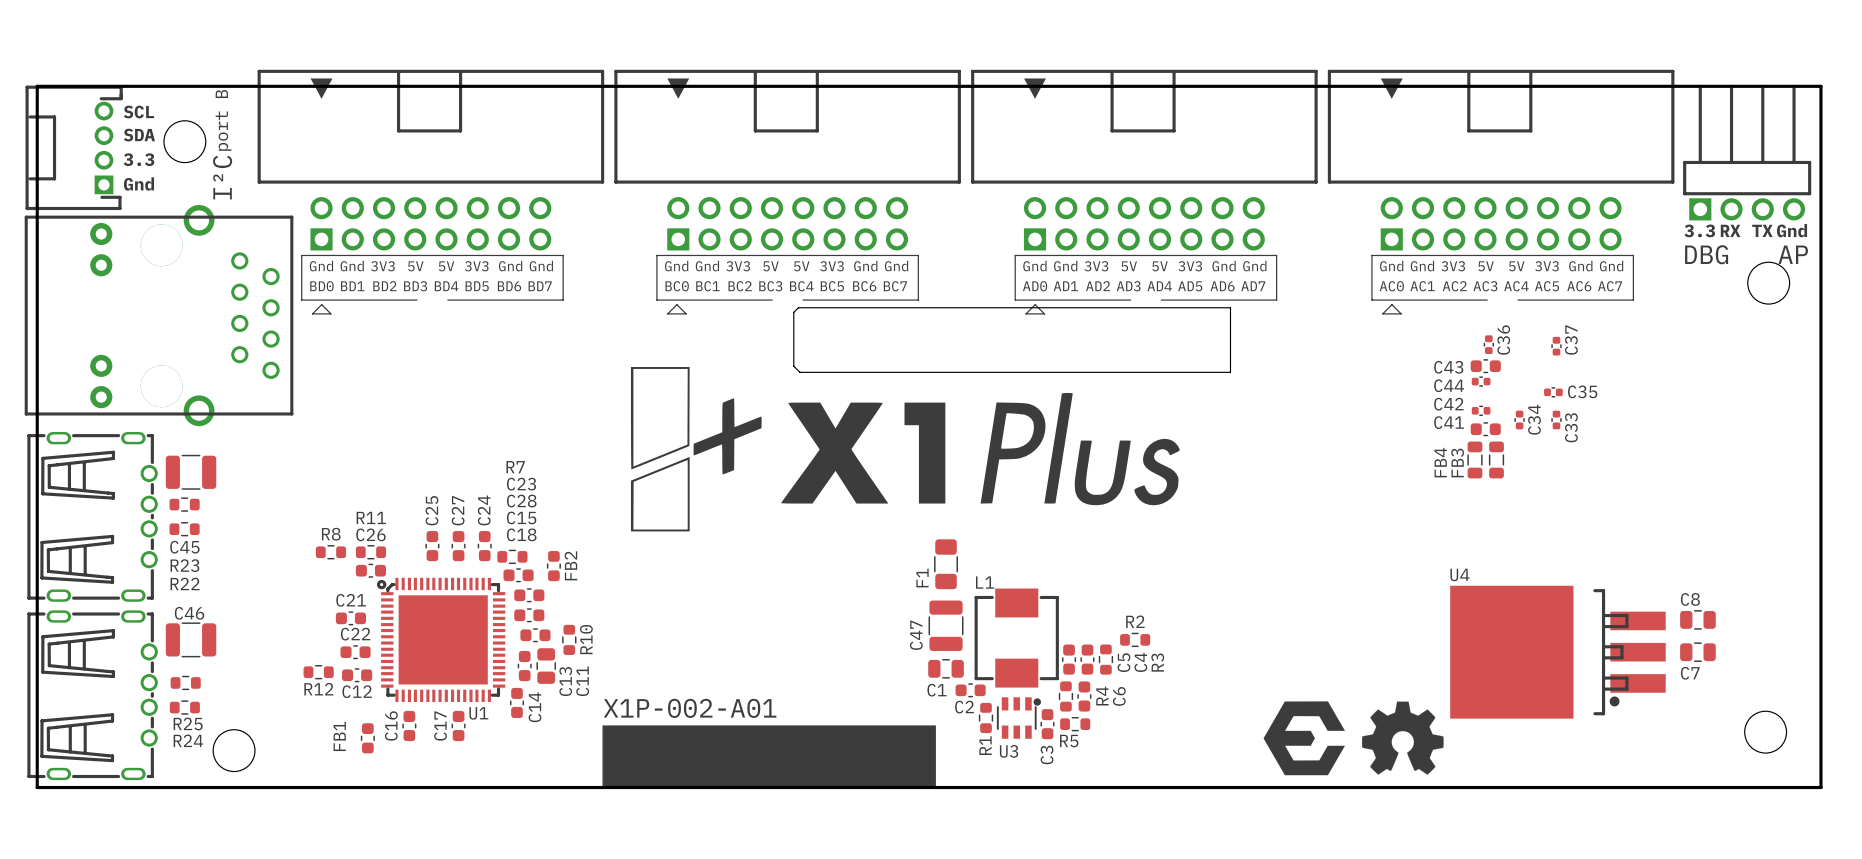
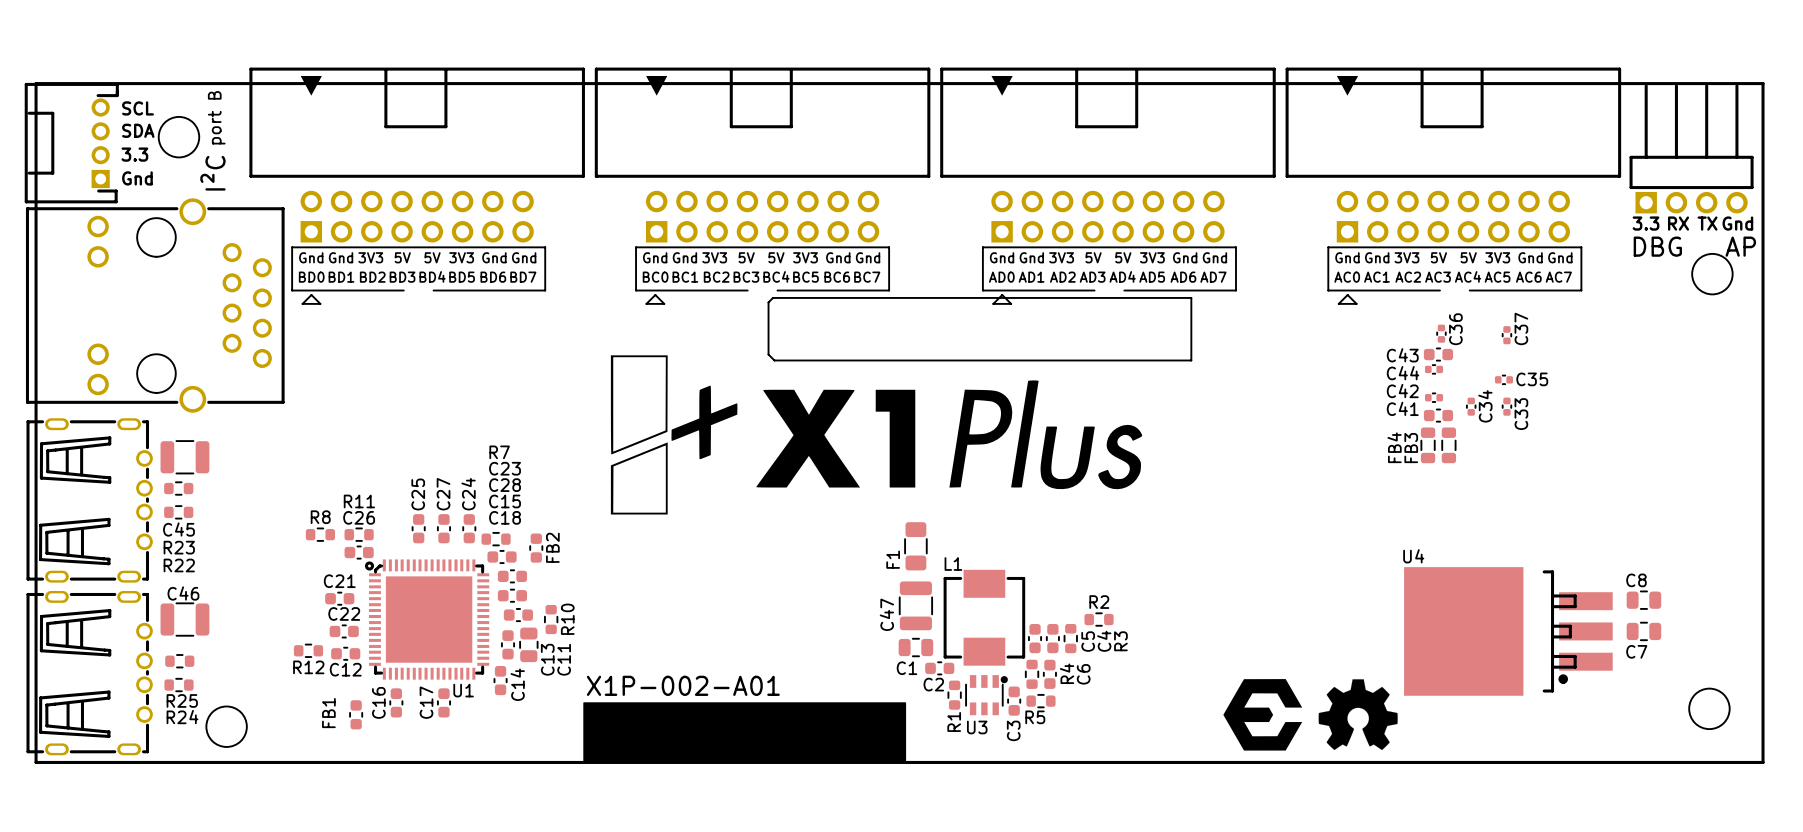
part footprint: [24, 204, 294, 427] -> [25, 198, 285, 413]

